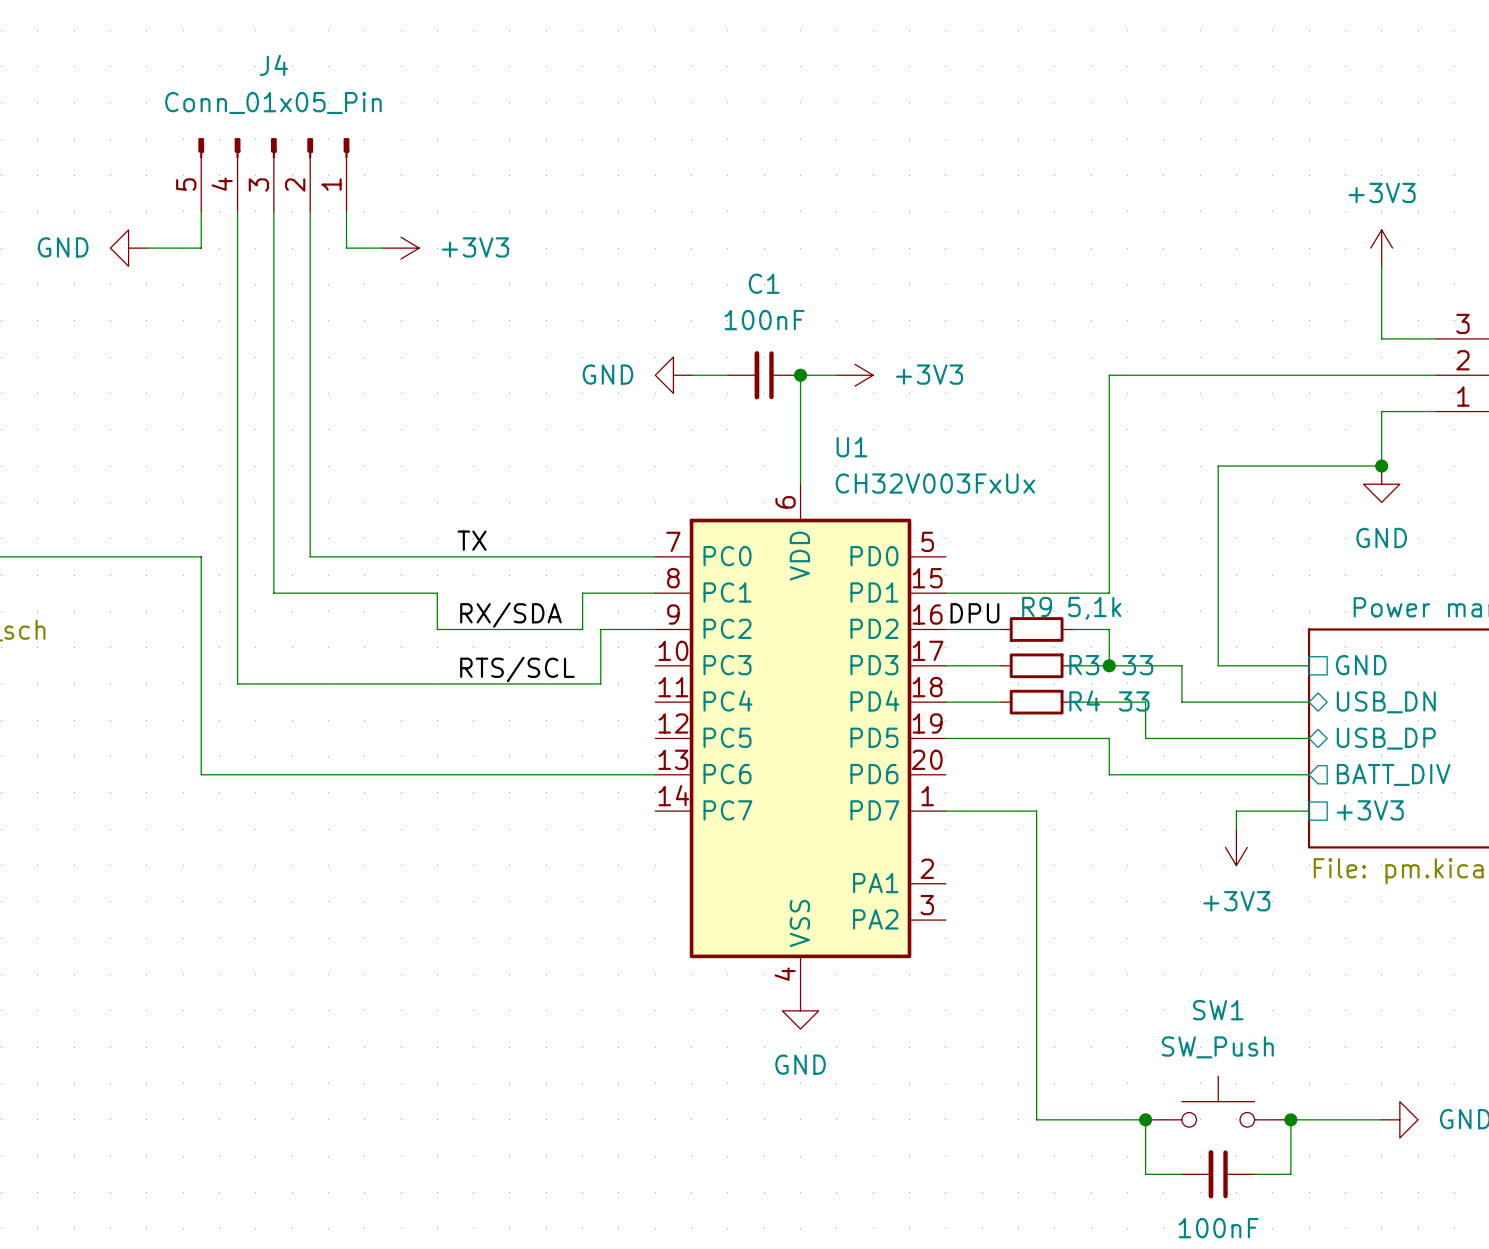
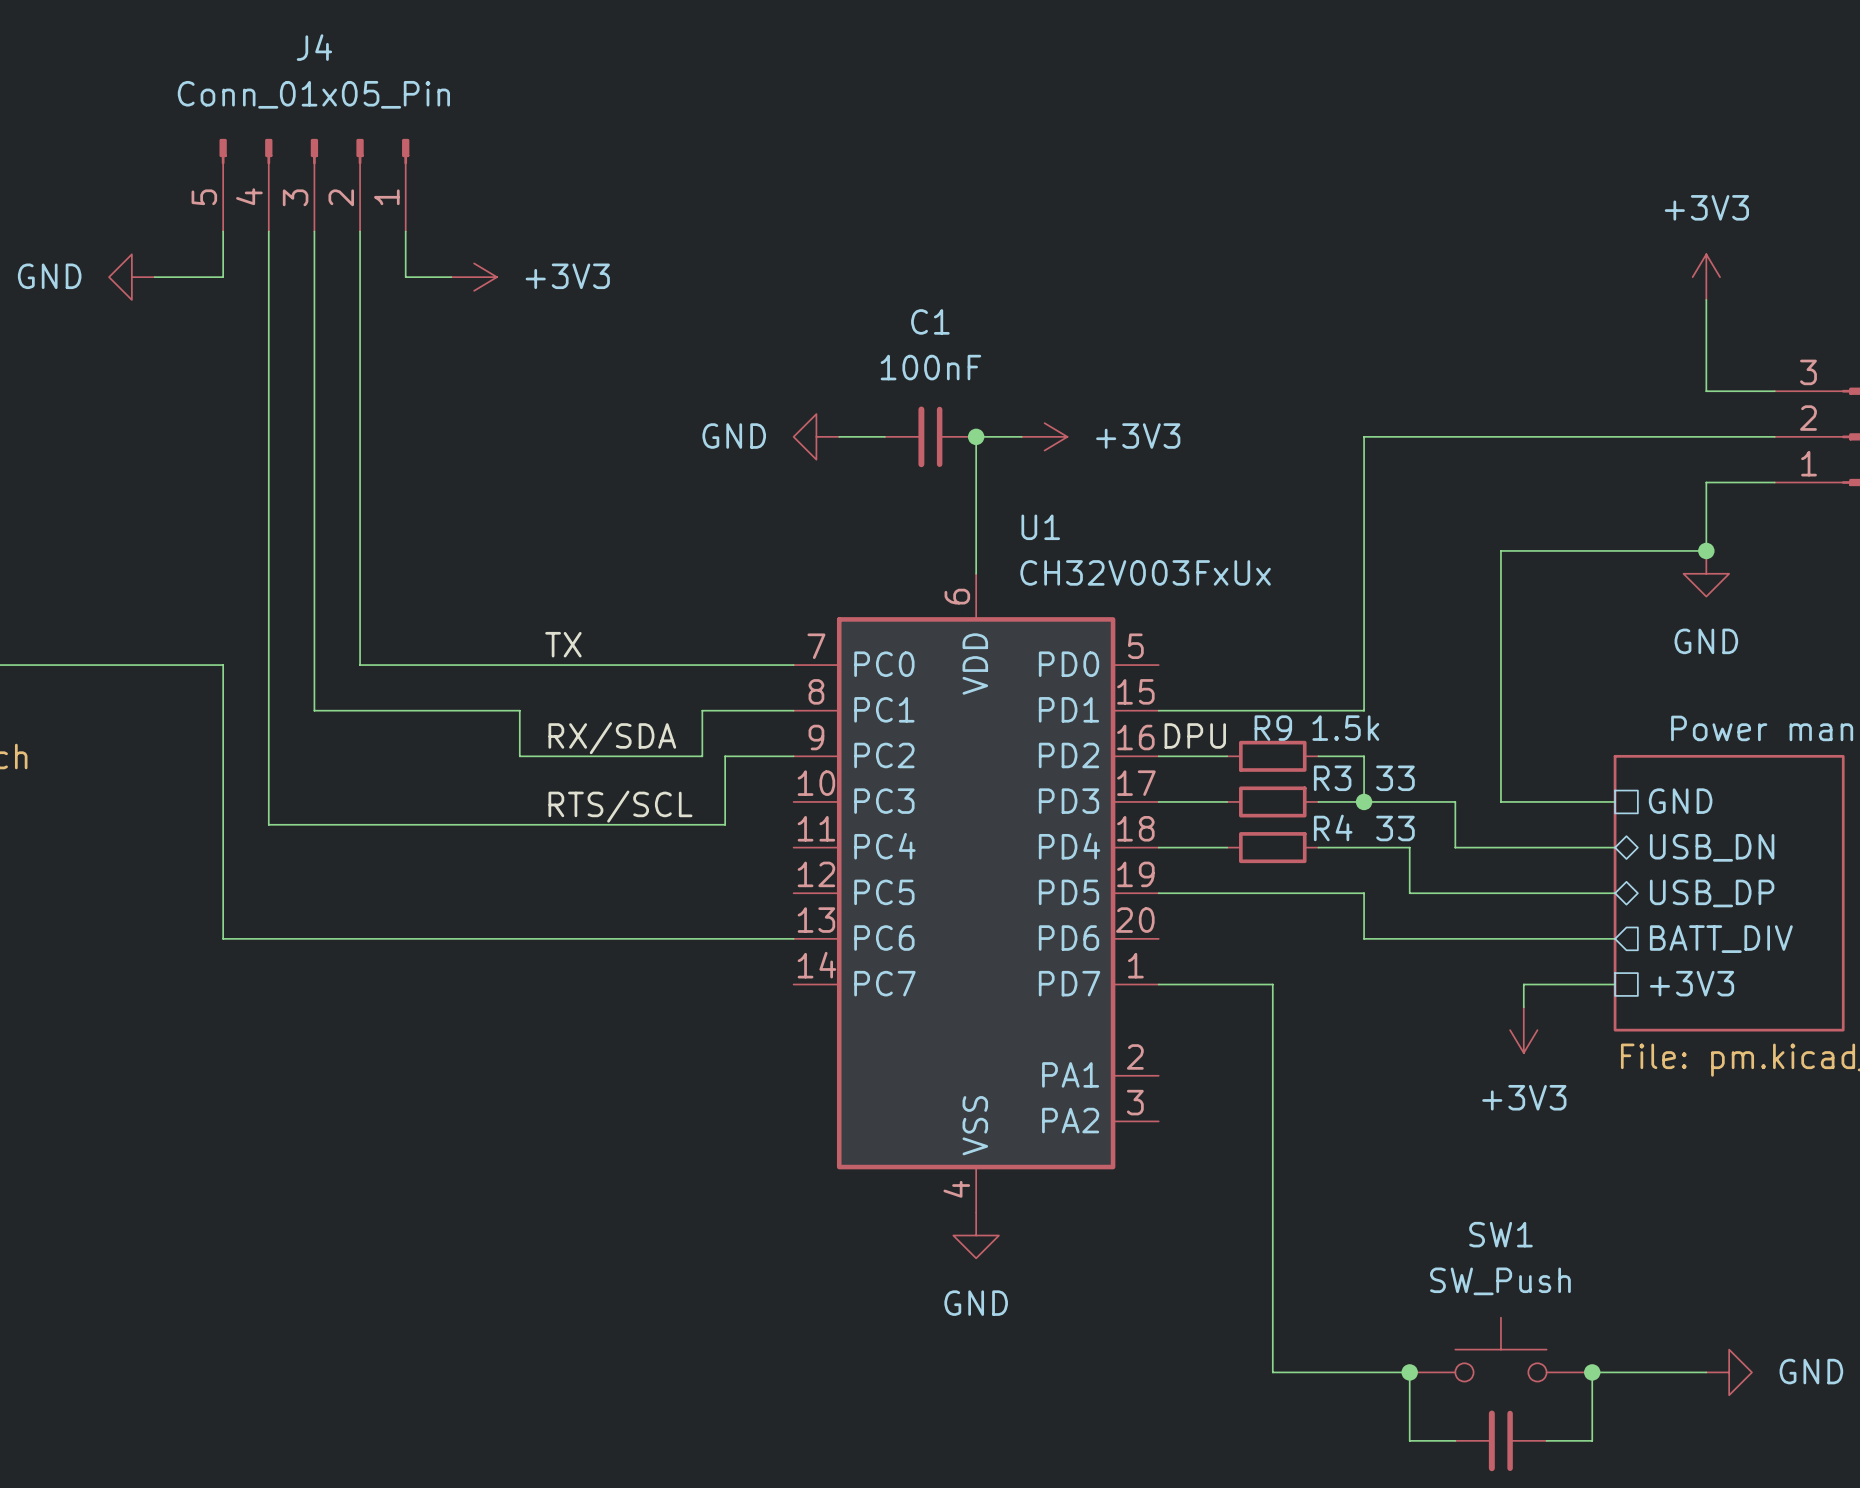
R9 value: 5,1k (1094, 608) -> 1.5k (1345, 728)
R3 name position: R3 (1084, 665) -> R3 (1332, 778)
R3 value position: 33 (1137, 665) -> 33 (1395, 778)
R4 name position: R4 (1084, 701) -> R4 (1333, 827)
R4 value position: 33 (1134, 701) -> 33 (1395, 828)

